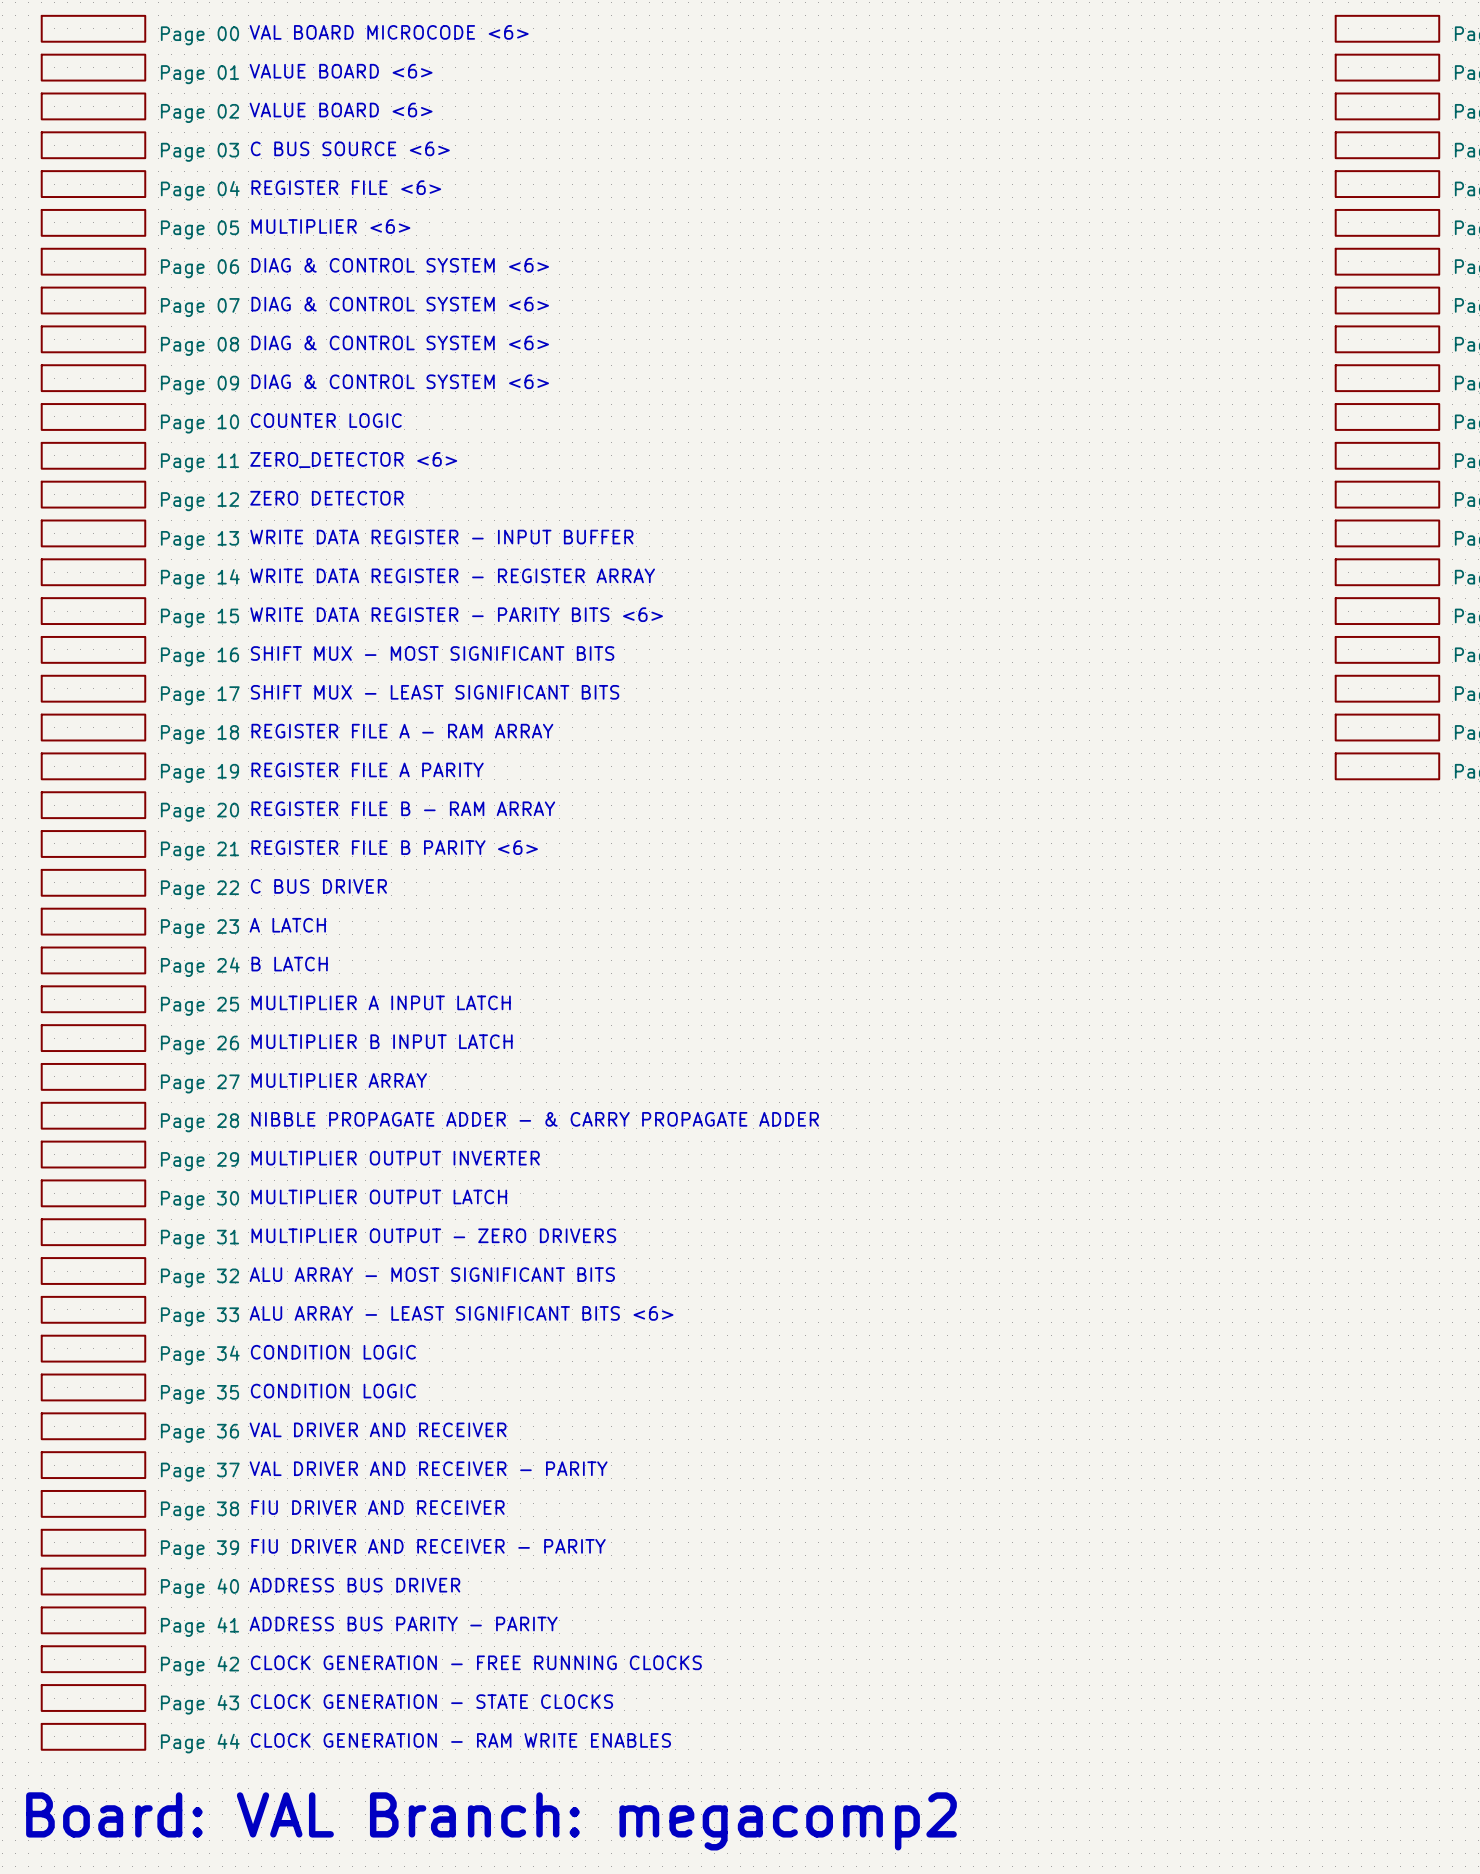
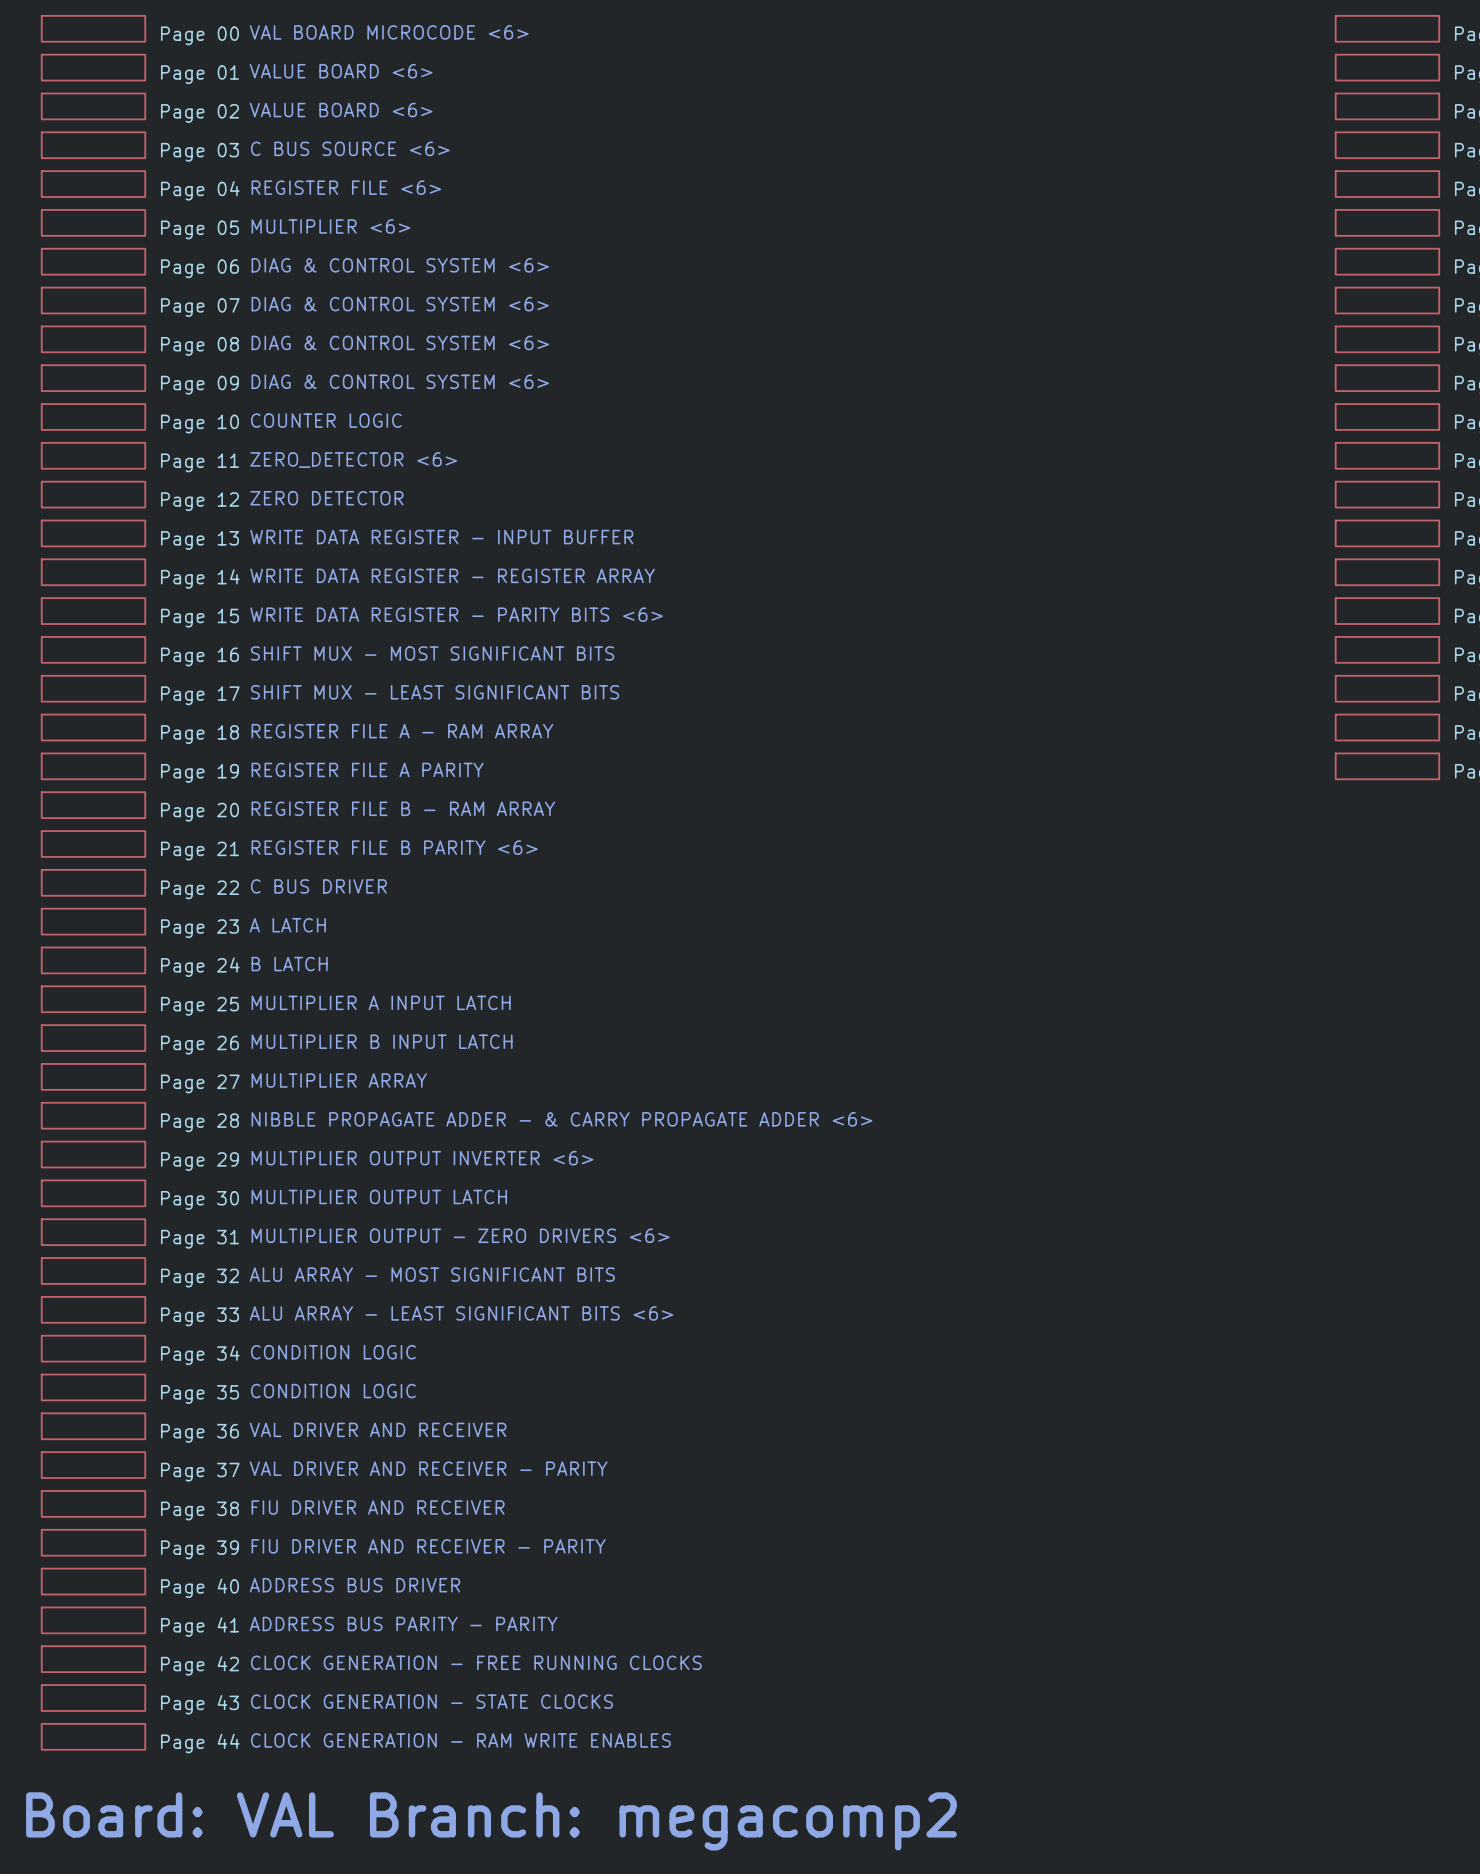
text: NIBBLE PROPAGATE ADDER - & CARRY PROPAGATE ADDER (535, 1119) -> NIBBLE PROPAGATE ADDER - & CARRY PROPAGATE ADDER <6> (561, 1119)
text: MULTIPLIER OUTPUT INVERTER (395, 1158) -> MULTIPLIER OUTPUT INVERTER <6> (422, 1158)
text: MULTIPLIER OUTPUT - ZERO DRIVERS (433, 1235) -> MULTIPLIER OUTPUT - ZERO DRIVERS <6> (460, 1235)

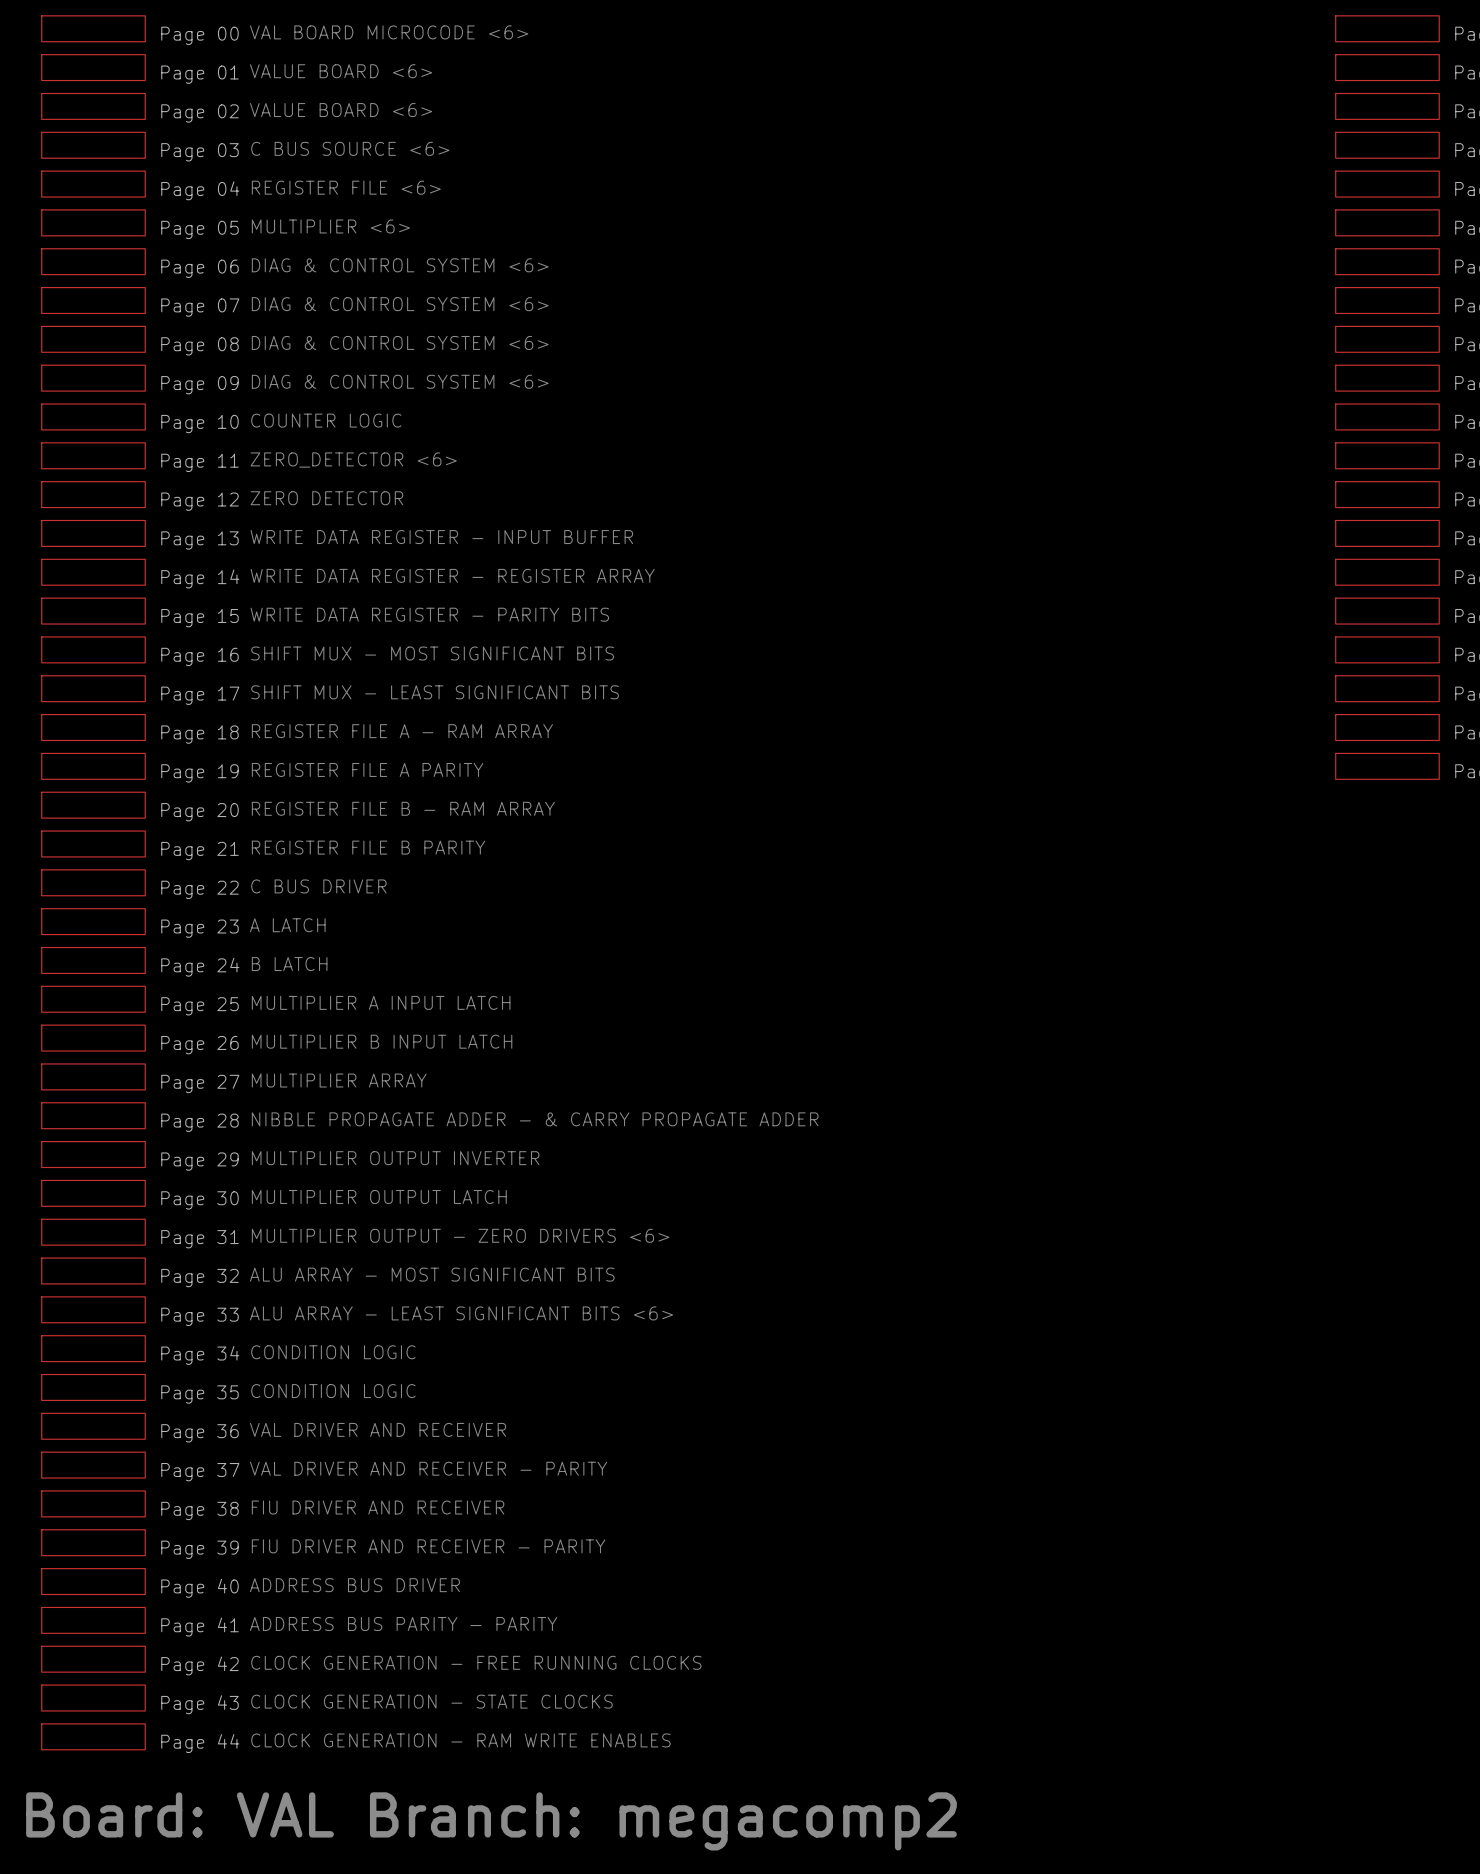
text: WRITE DATA REGISTER - PARITY BITS <6> (456, 614) -> WRITE DATA REGISTER - PARITY BITS (429, 614)
text: REGISTER FILE B PARITY <6> (394, 847) -> REGISTER FILE B PARITY (368, 847)
text: NIBBLE PROPAGATE ADDER - & CARRY PROPAGATE ADDER <6> (561, 1119) -> NIBBLE PROPAGATE ADDER - & CARRY PROPAGATE ADDER (535, 1119)
text: MULTIPLIER OUTPUT INVERTER <6> (422, 1158) -> MULTIPLIER OUTPUT INVERTER (395, 1158)

